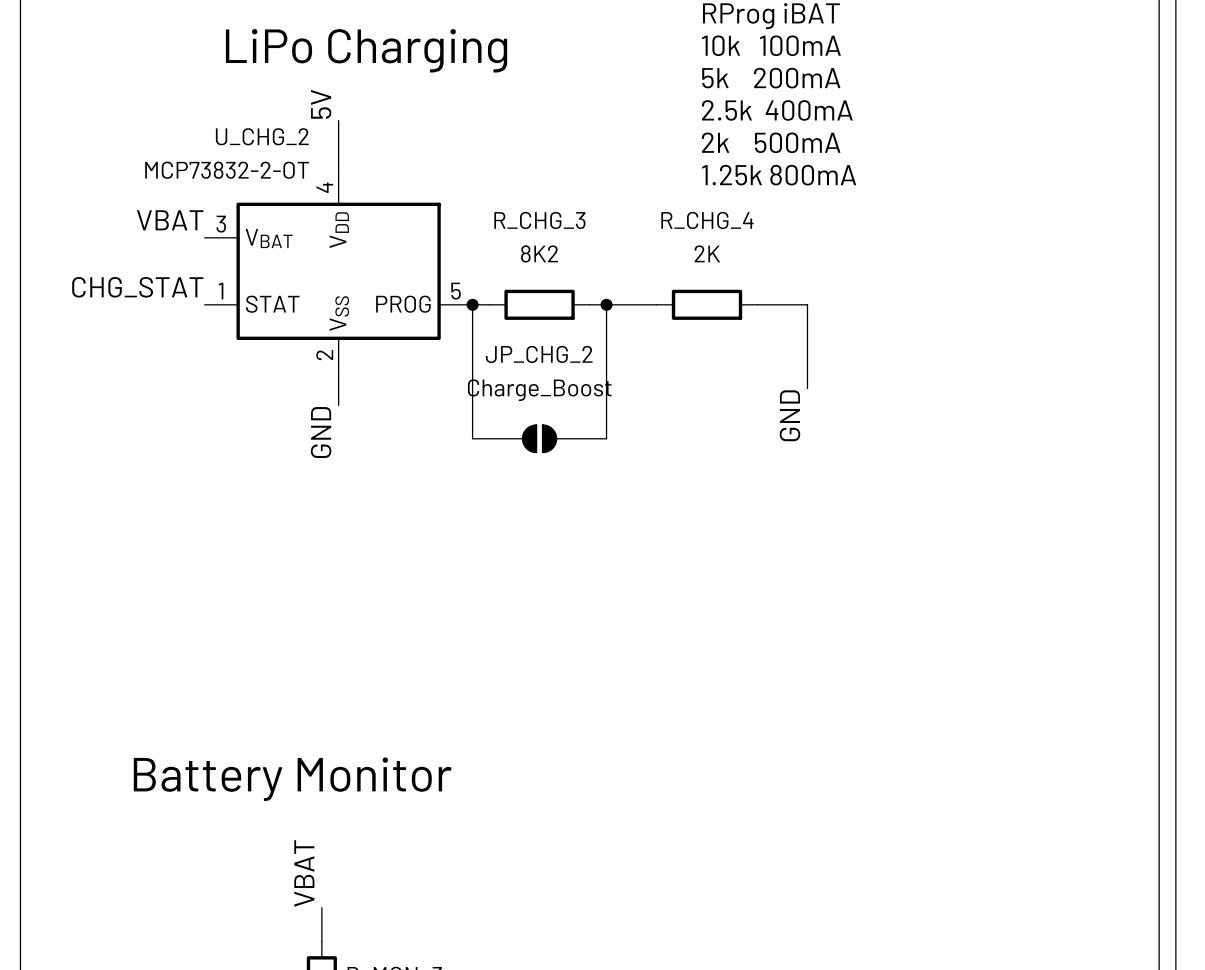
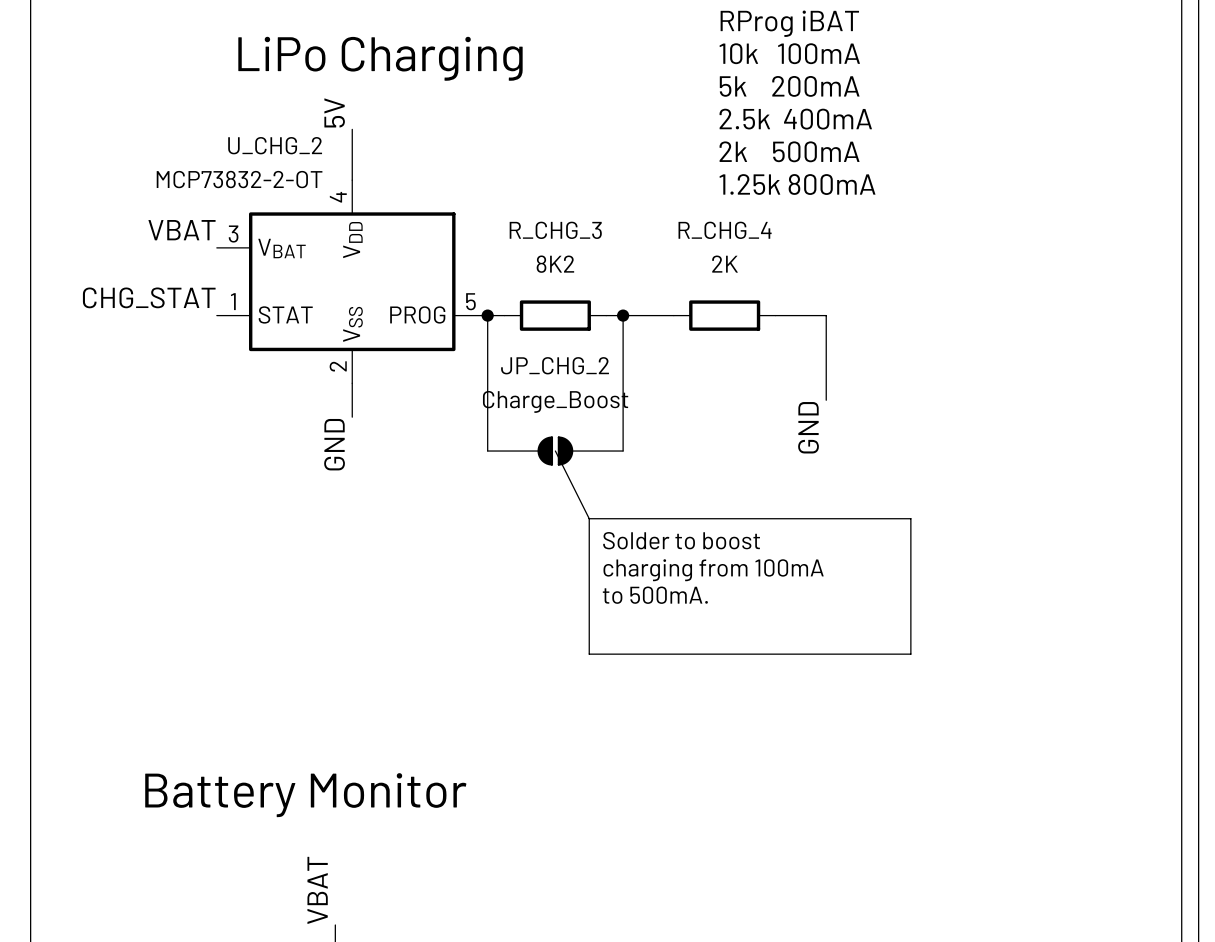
line: none -> (555, 451) (589, 518)
line: none -> (589, 518) (910, 518) (910, 654) (589, 654) (589, 518)
text: none -> Solder to boost (681, 540)
text: none -> charging from 100mA (713, 570)
text: none -> to 500mA. (655, 595)

